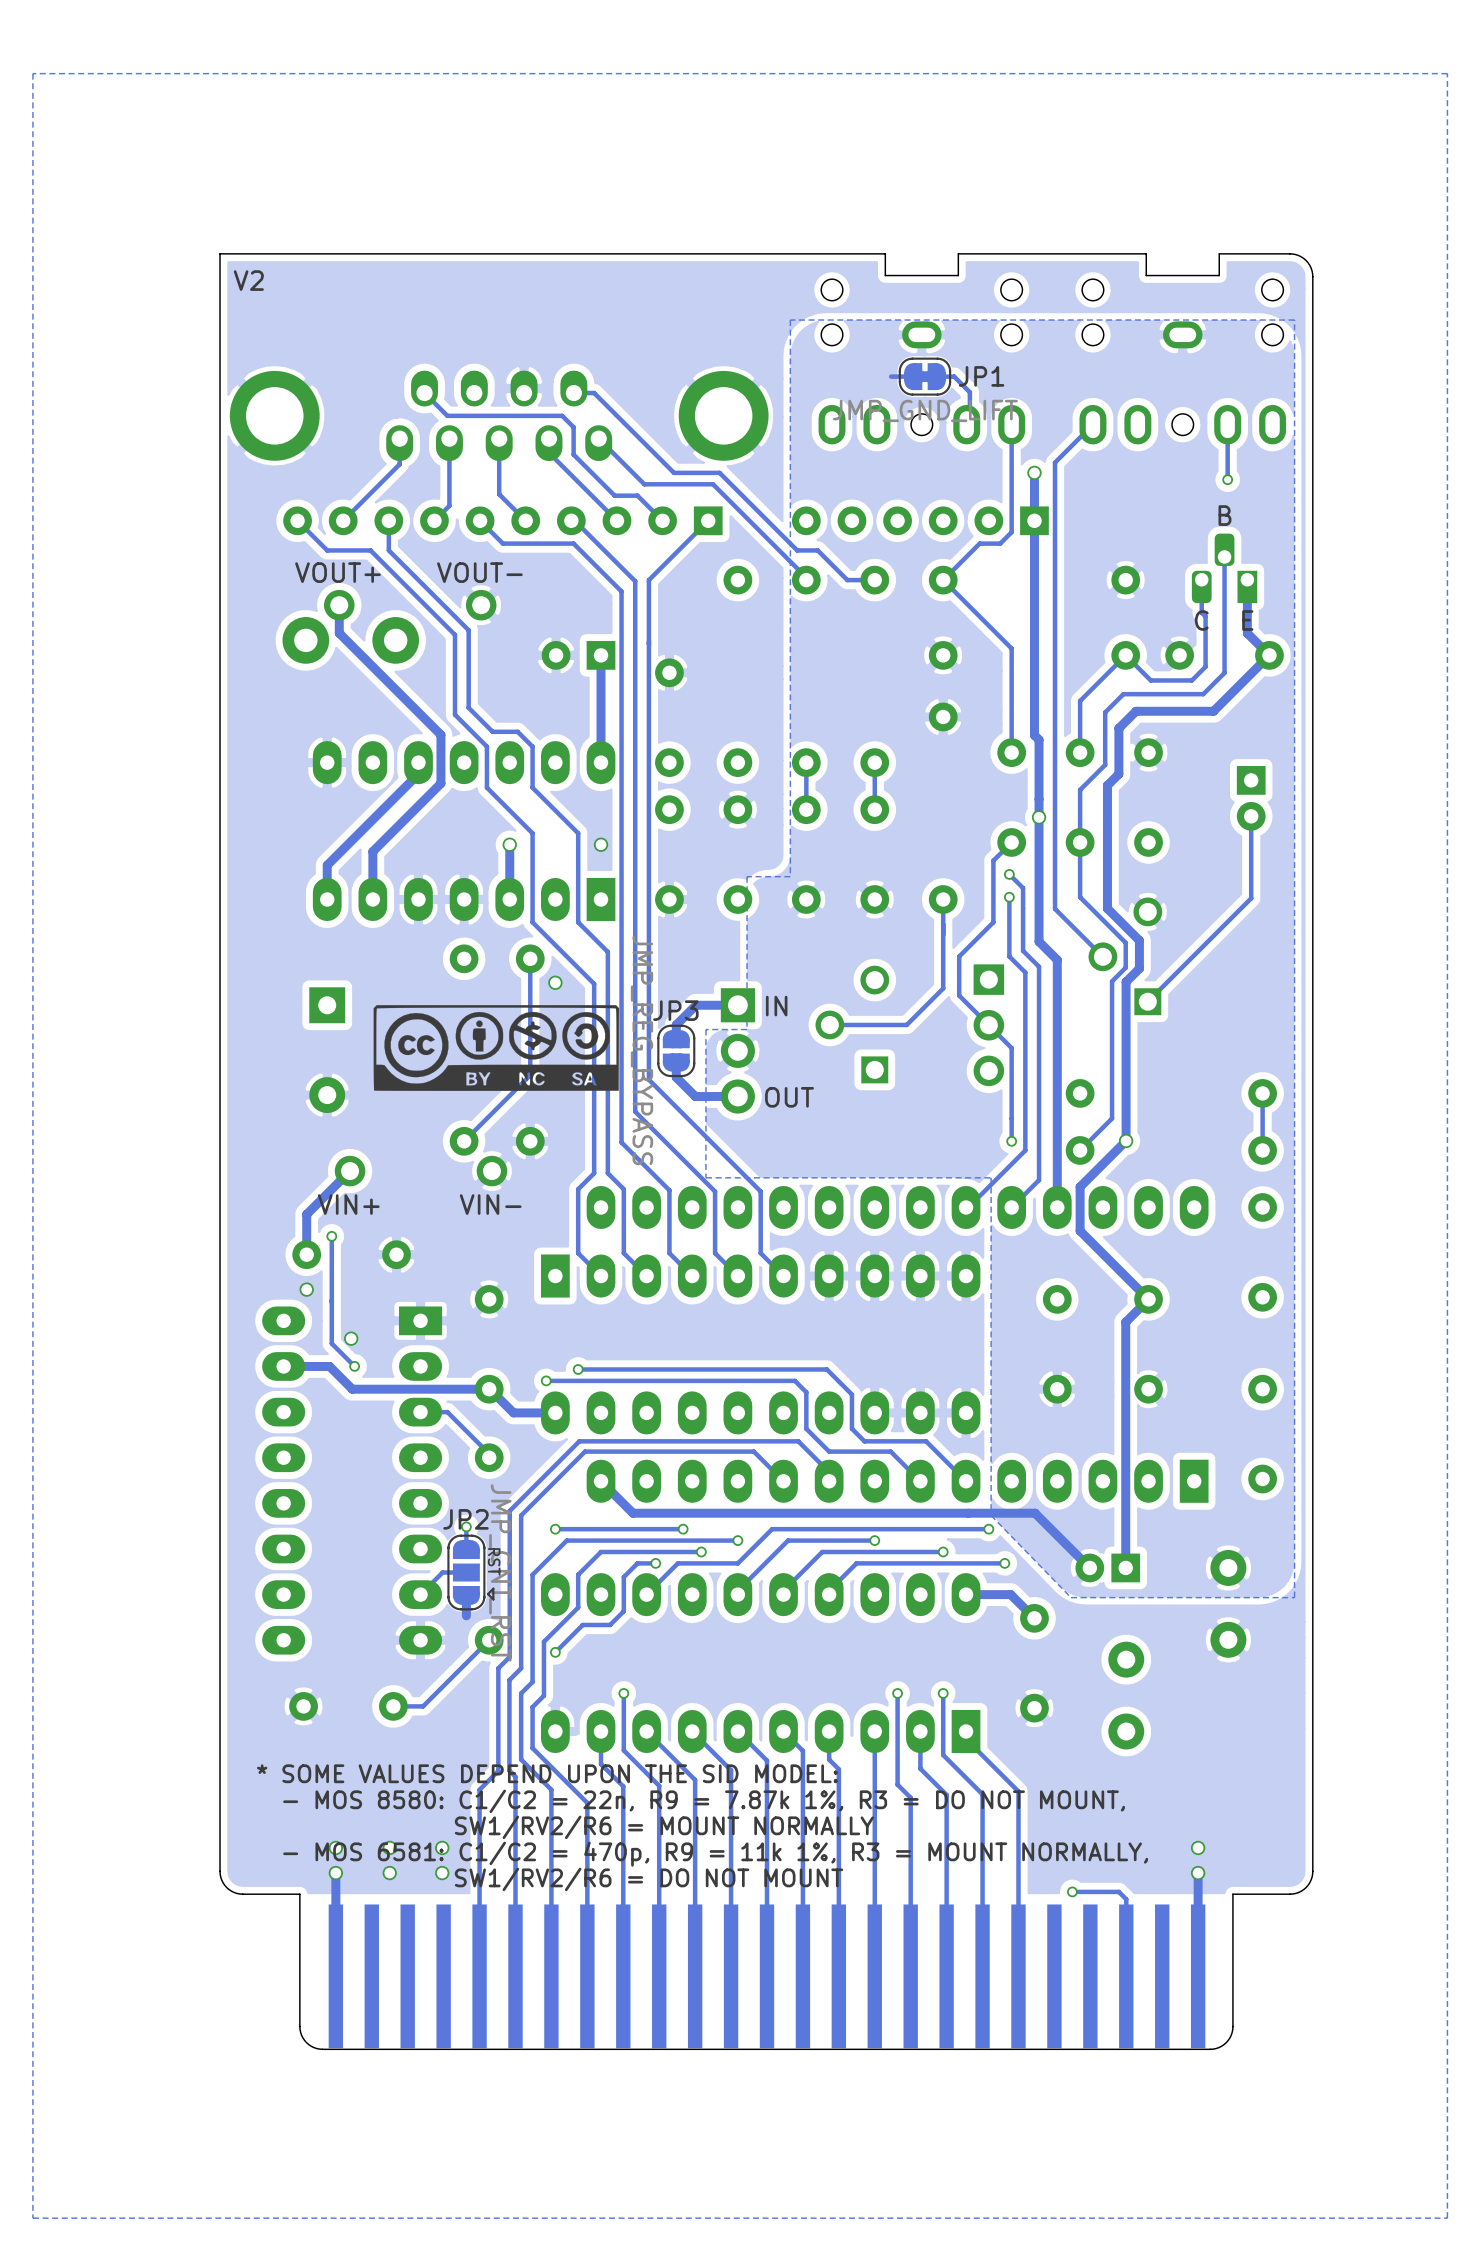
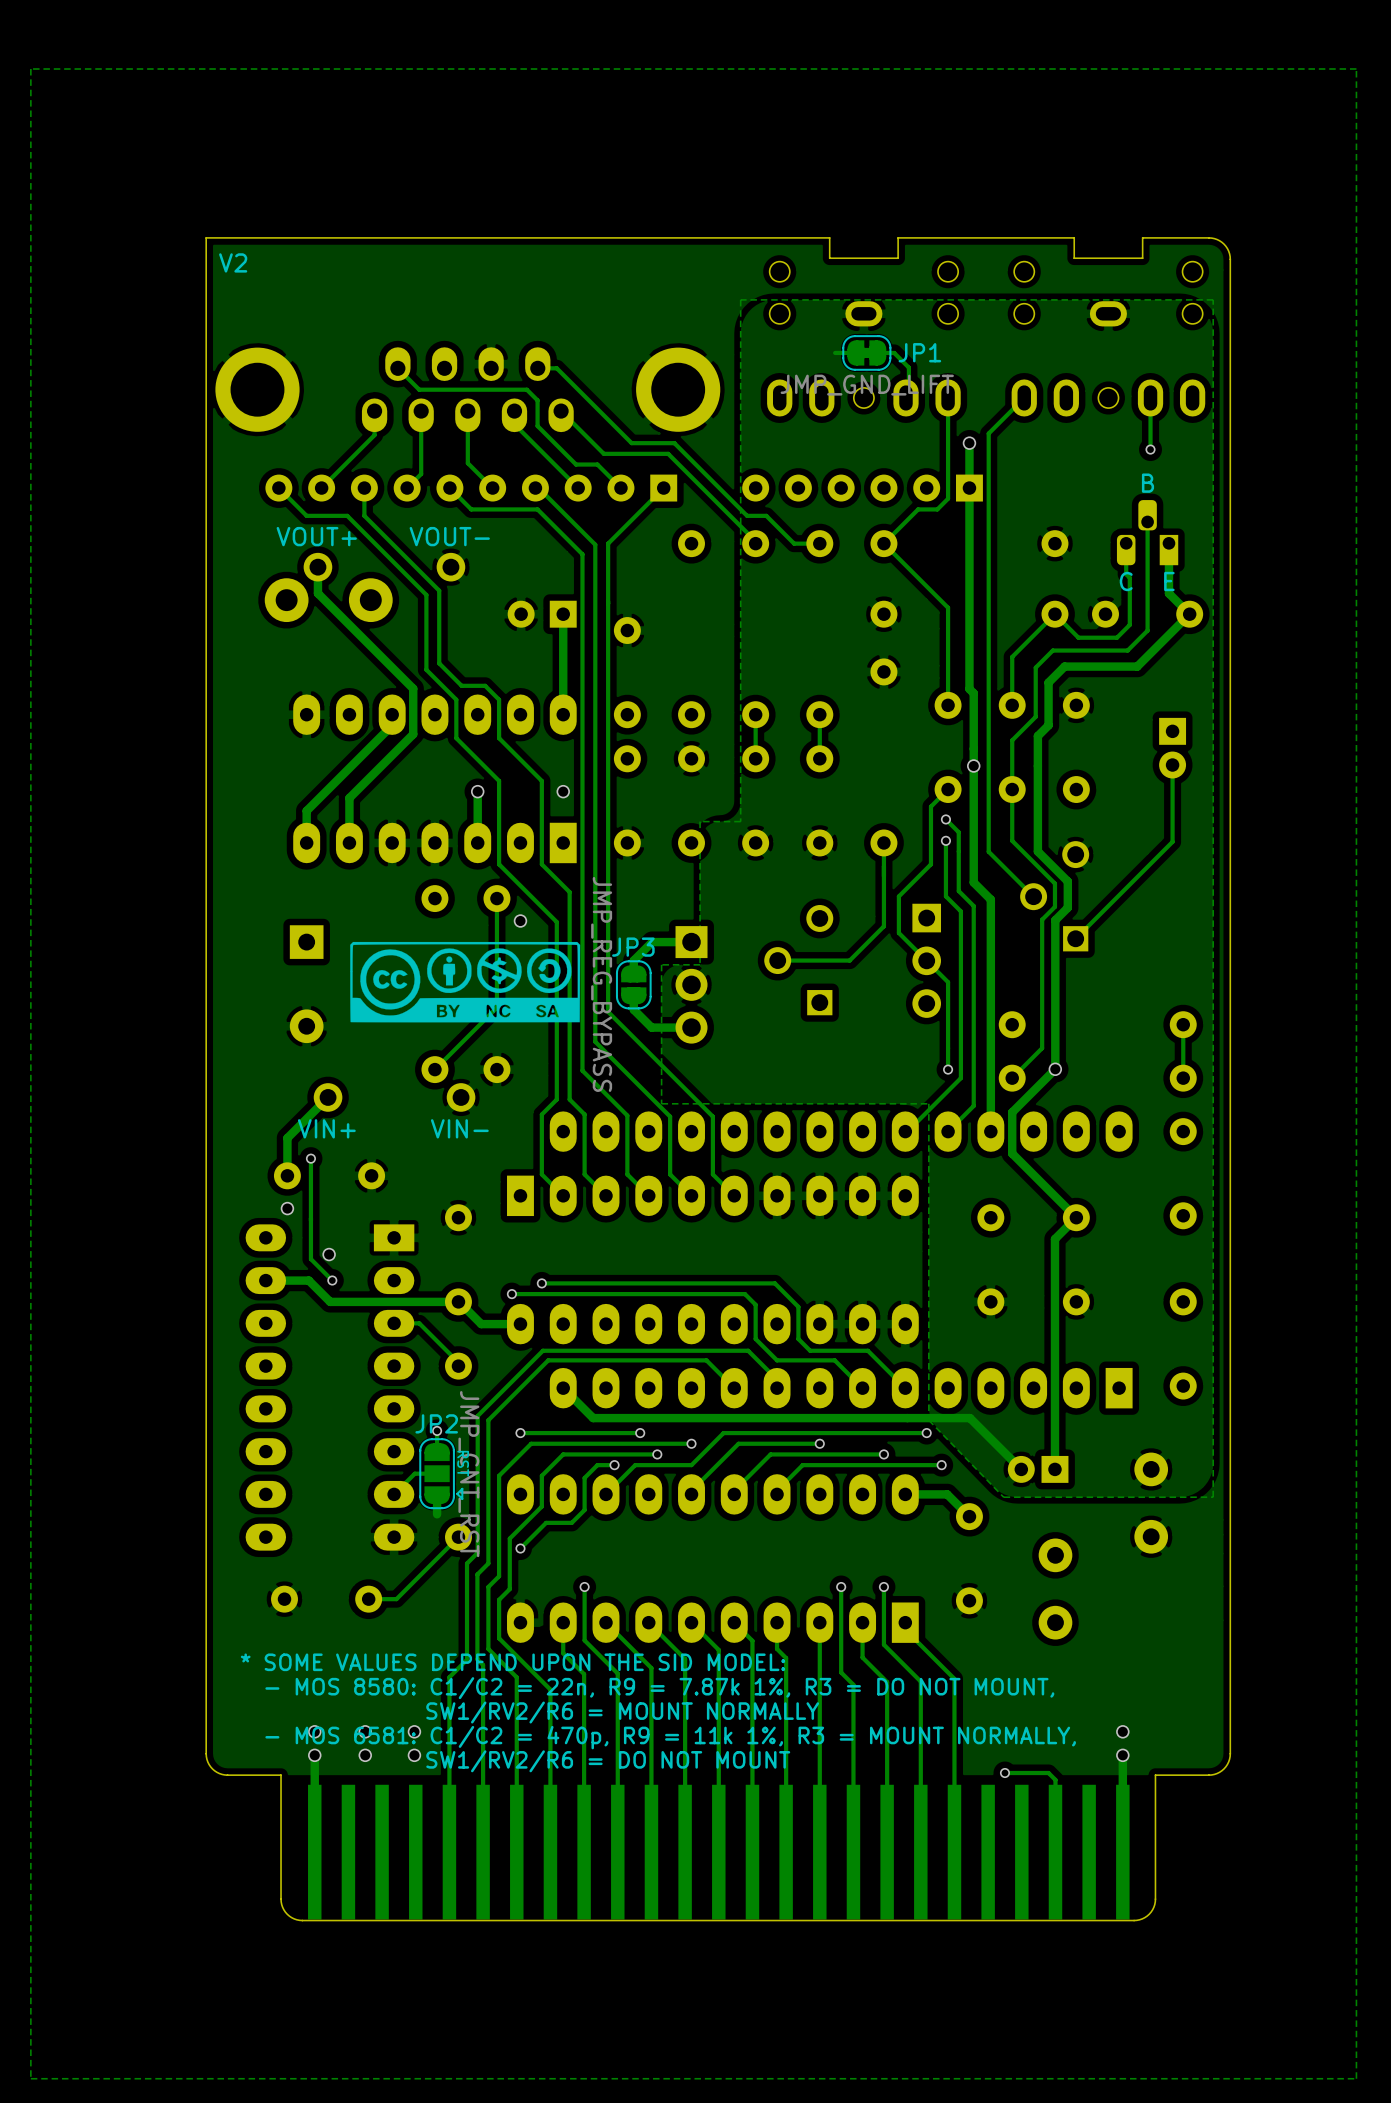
text: IN (776, 1006) -> none
text: OUT (789, 1097) -> none

